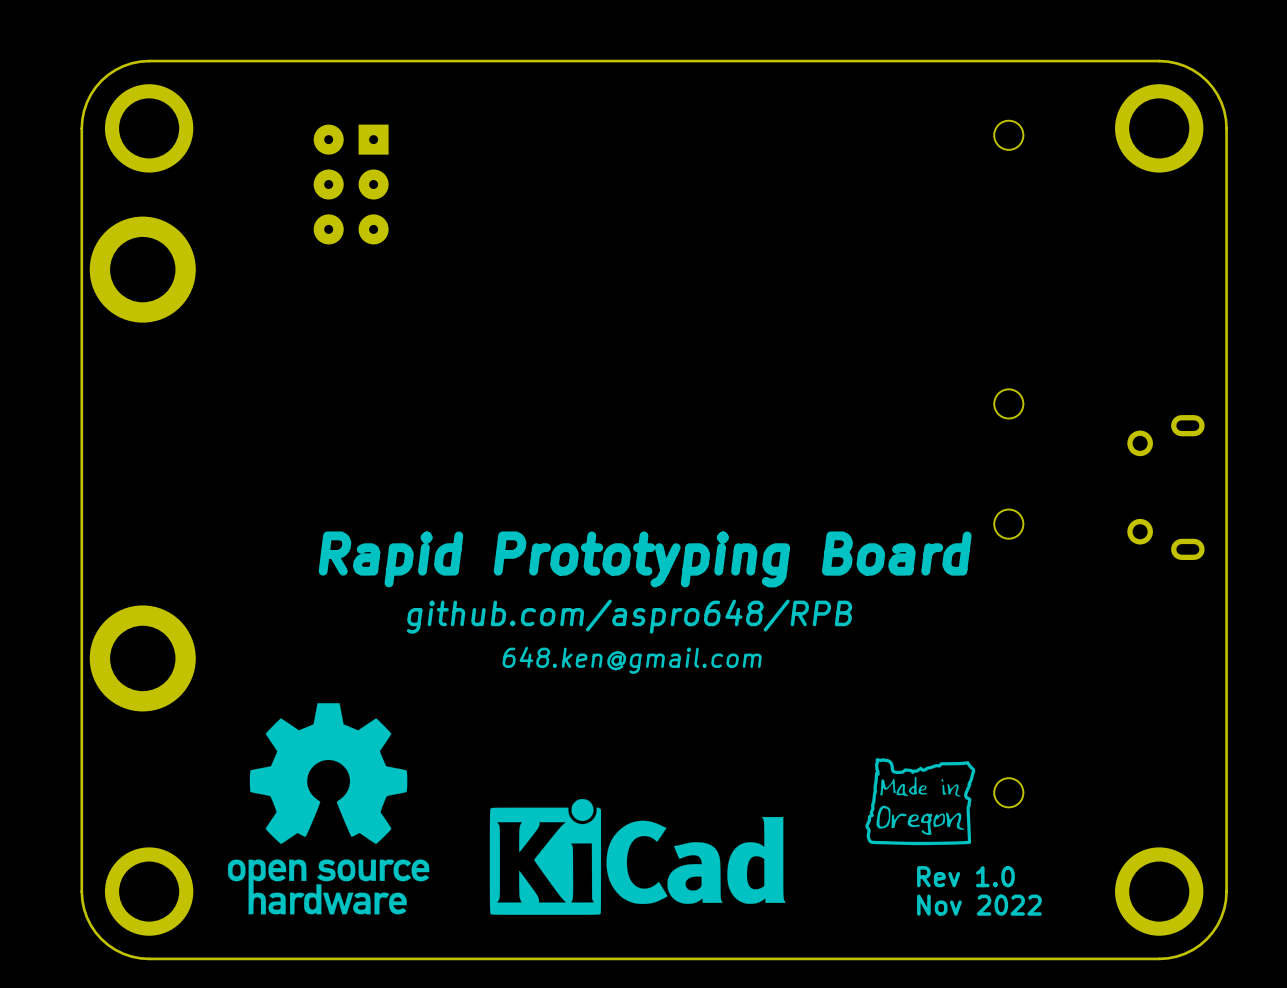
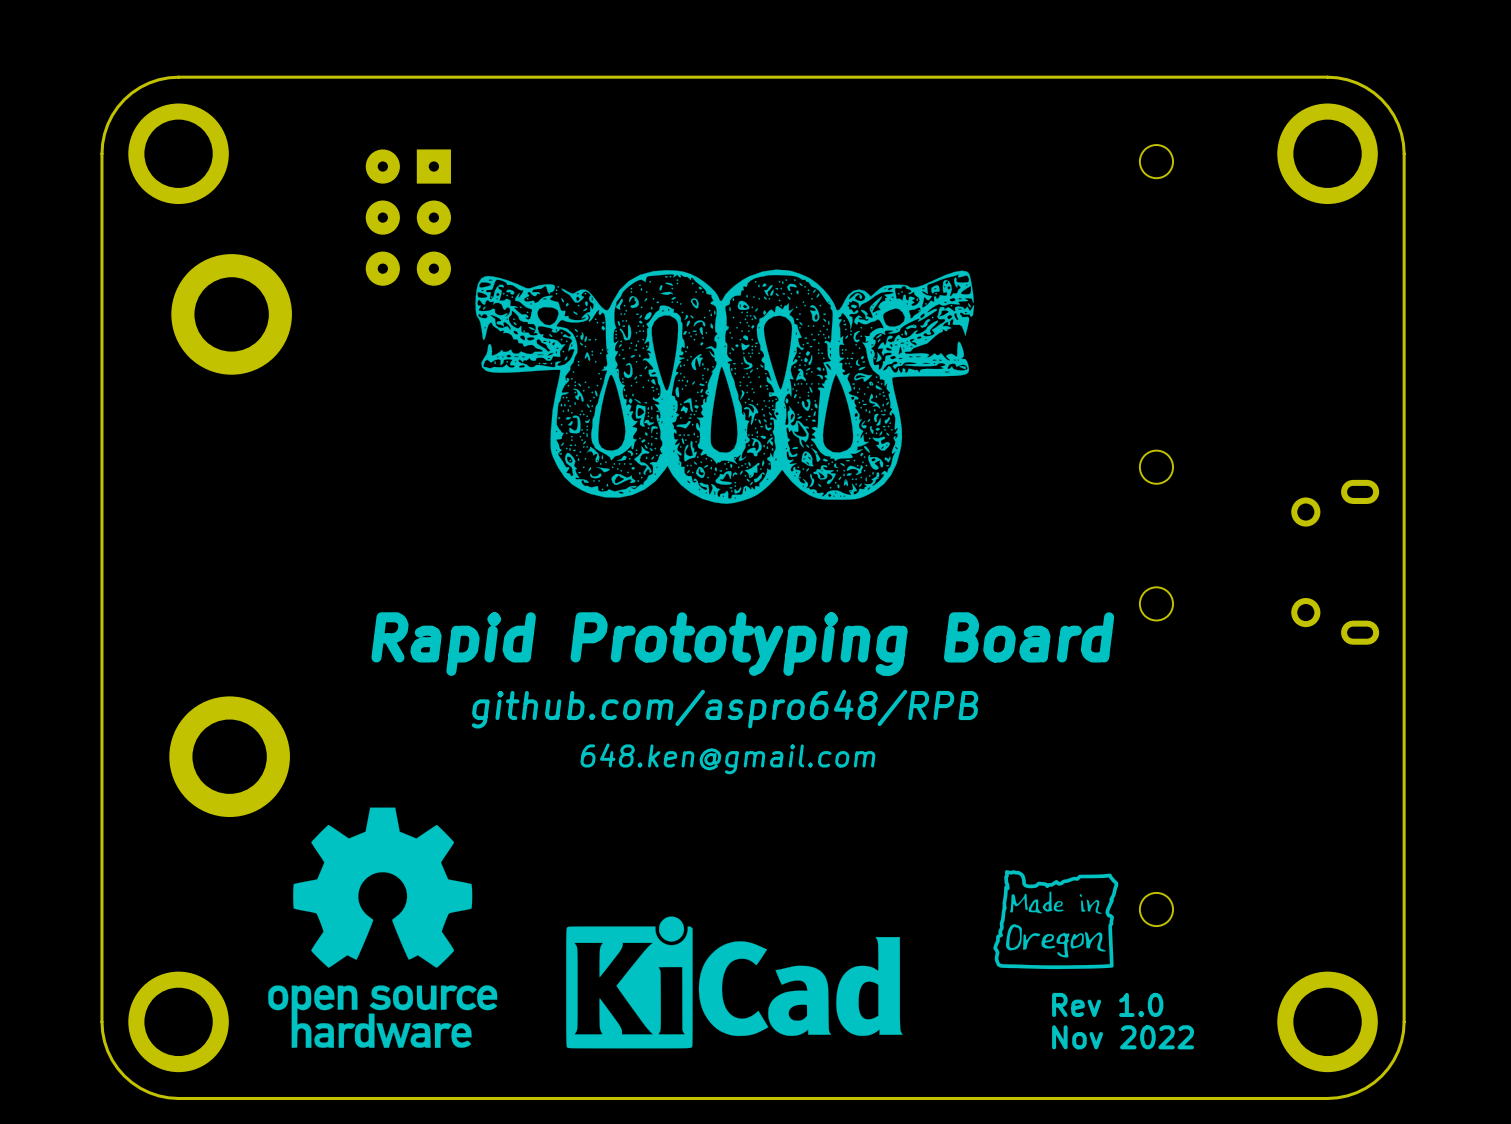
drawing: none -> [475, 269, 975, 504]
part position: (142, 269) -> (231, 314)
part position: (142, 658) -> (229, 756)

